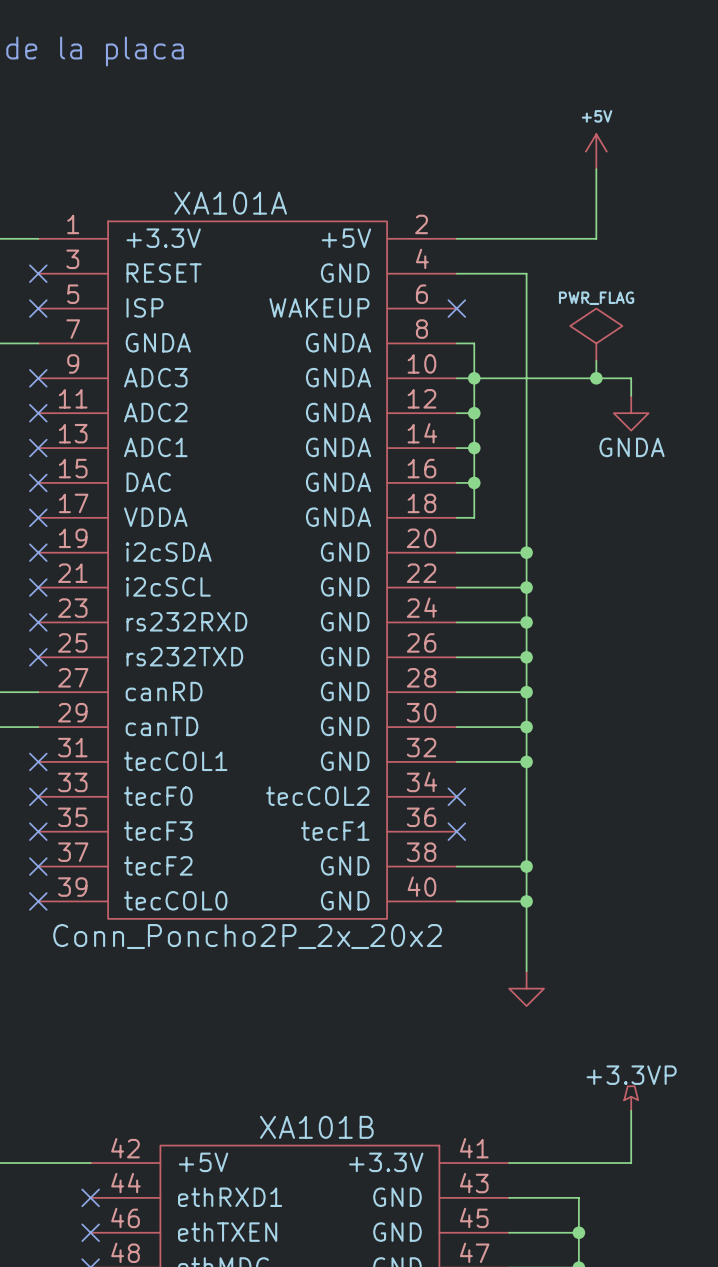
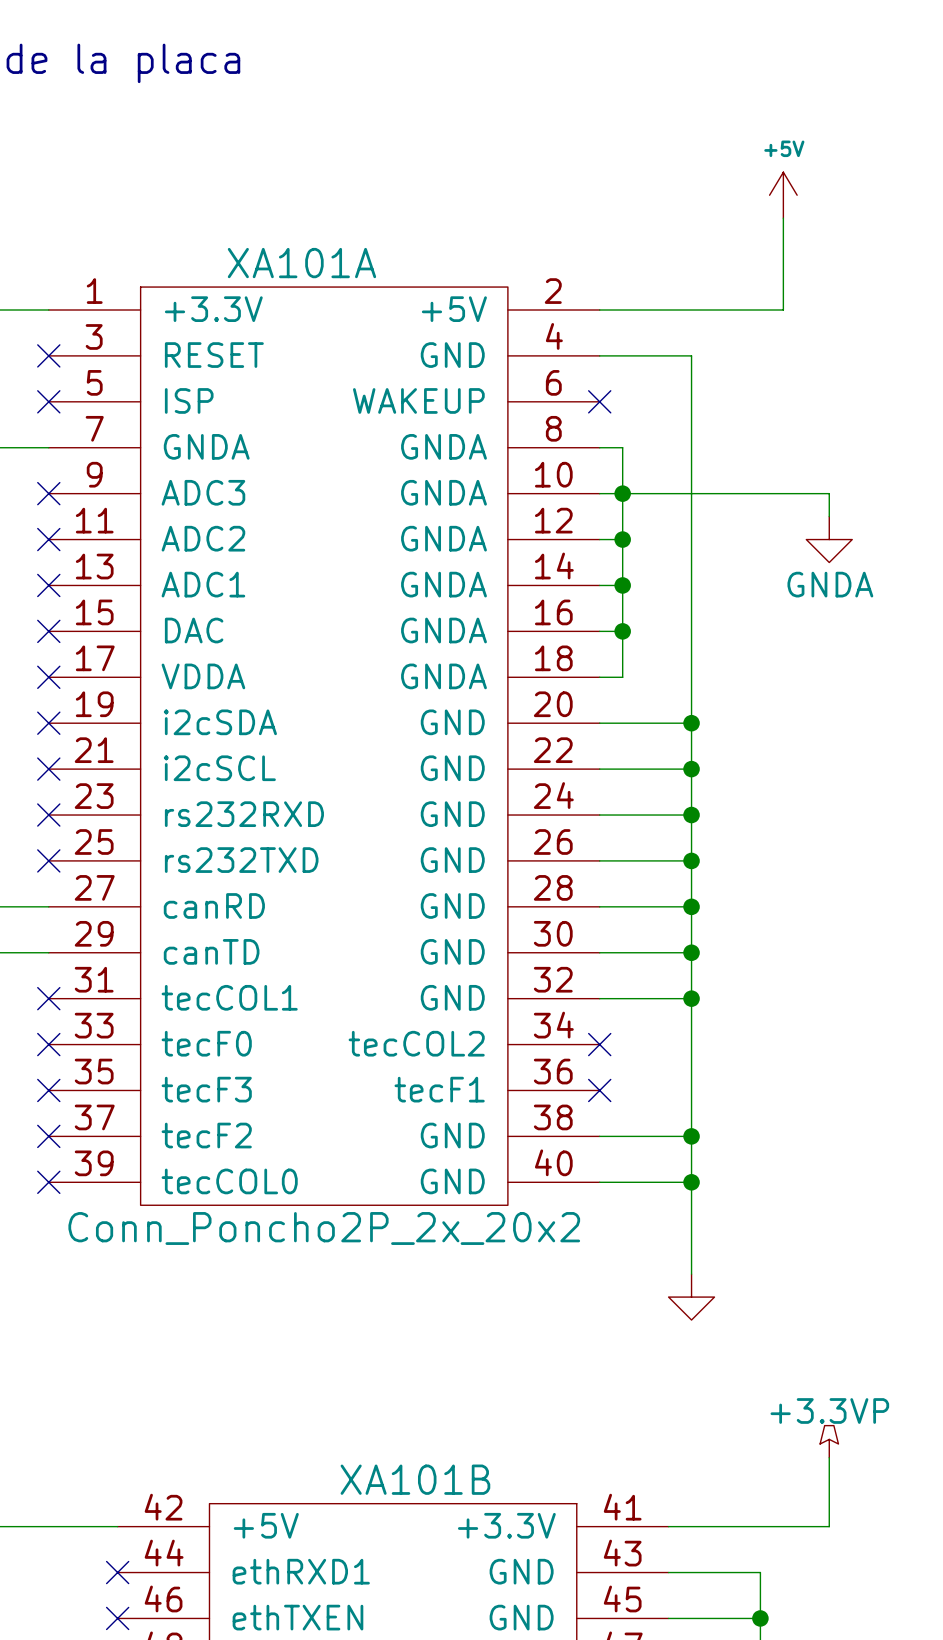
power symbol: PWR_FLAG (596, 334) -> none
wire: (596, 360) (596, 378) -> none
junction: (596, 378) -> none

